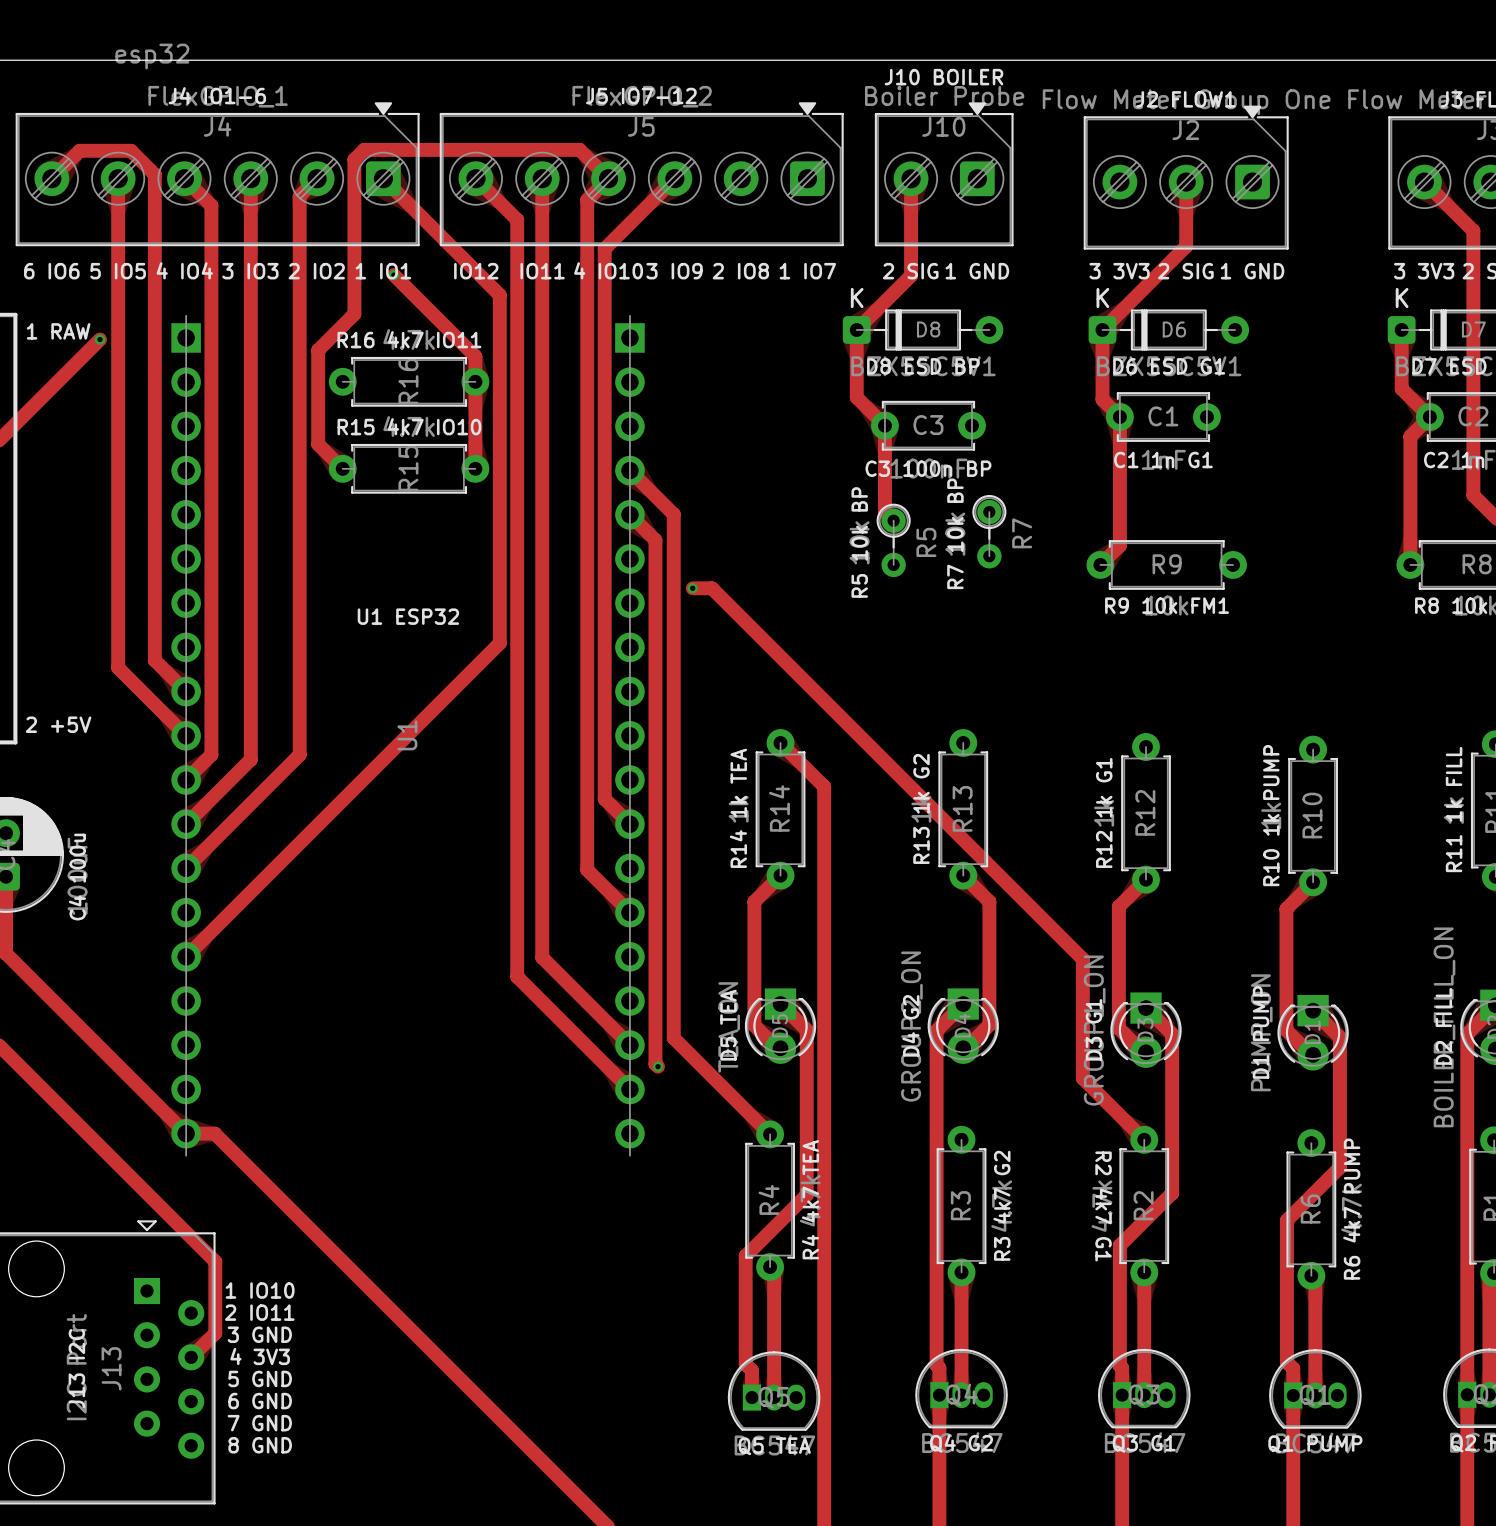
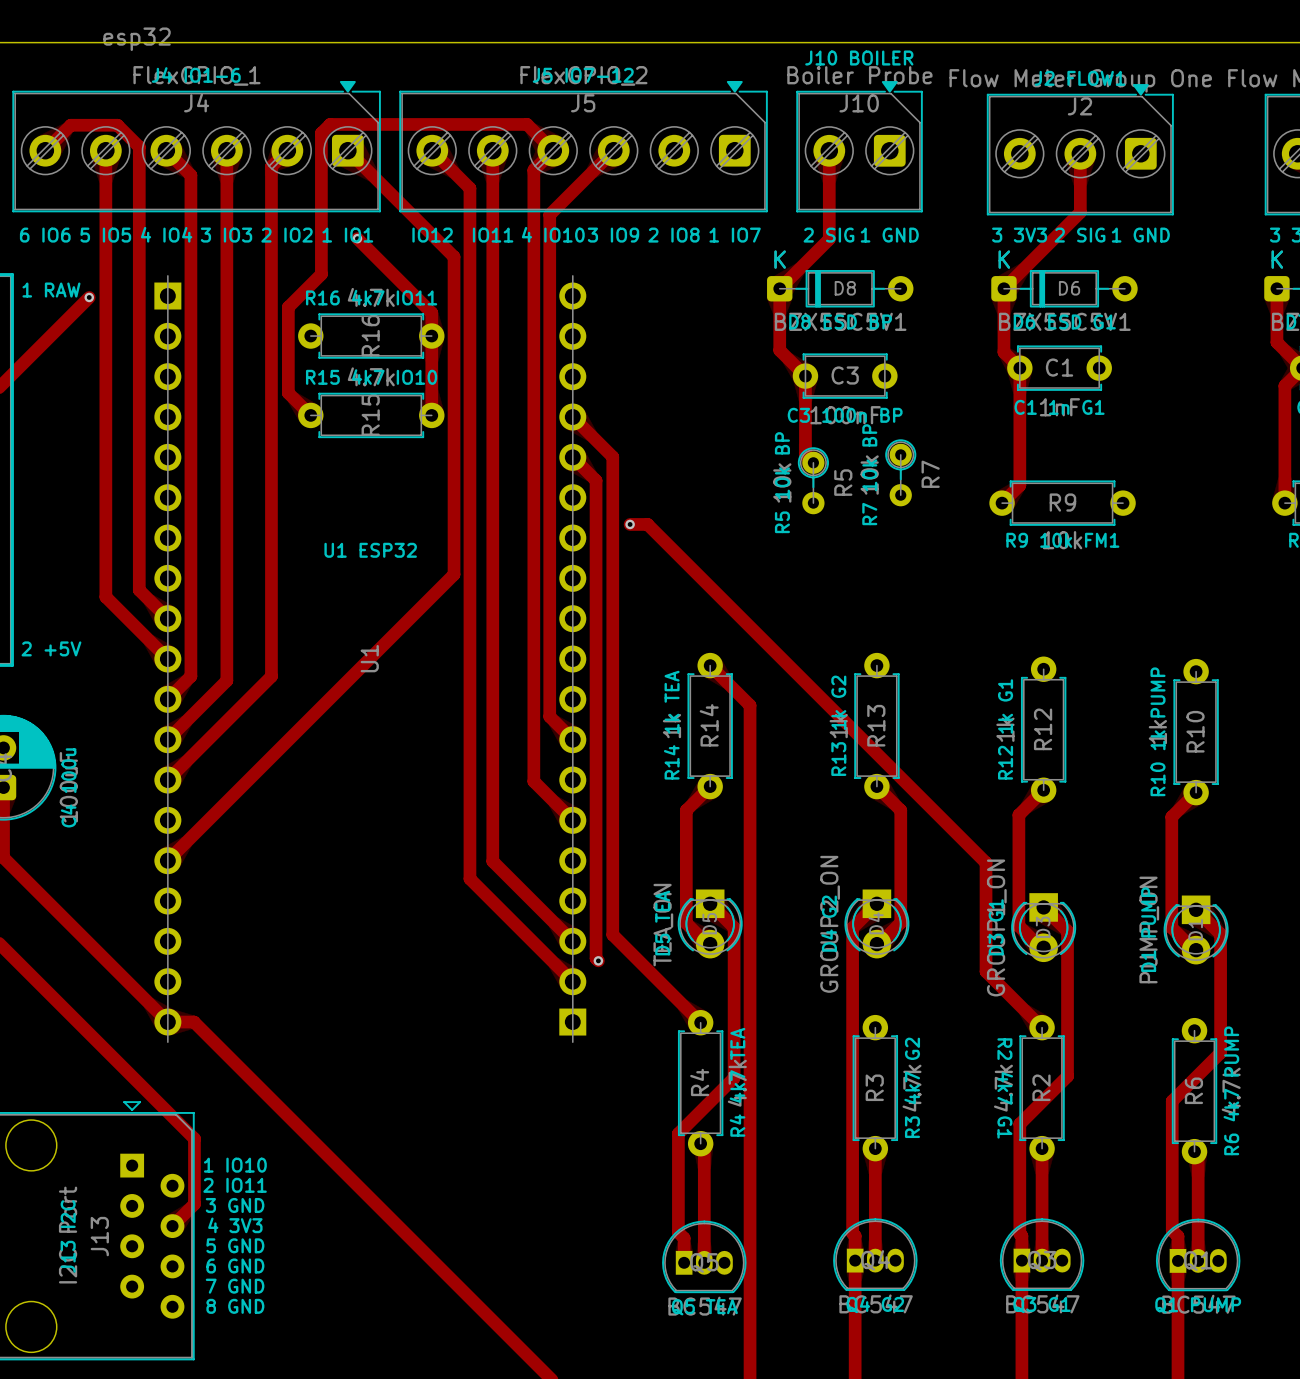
U1 footprint: [171, 314, 645, 1157] -> [154, 275, 587, 1044]

